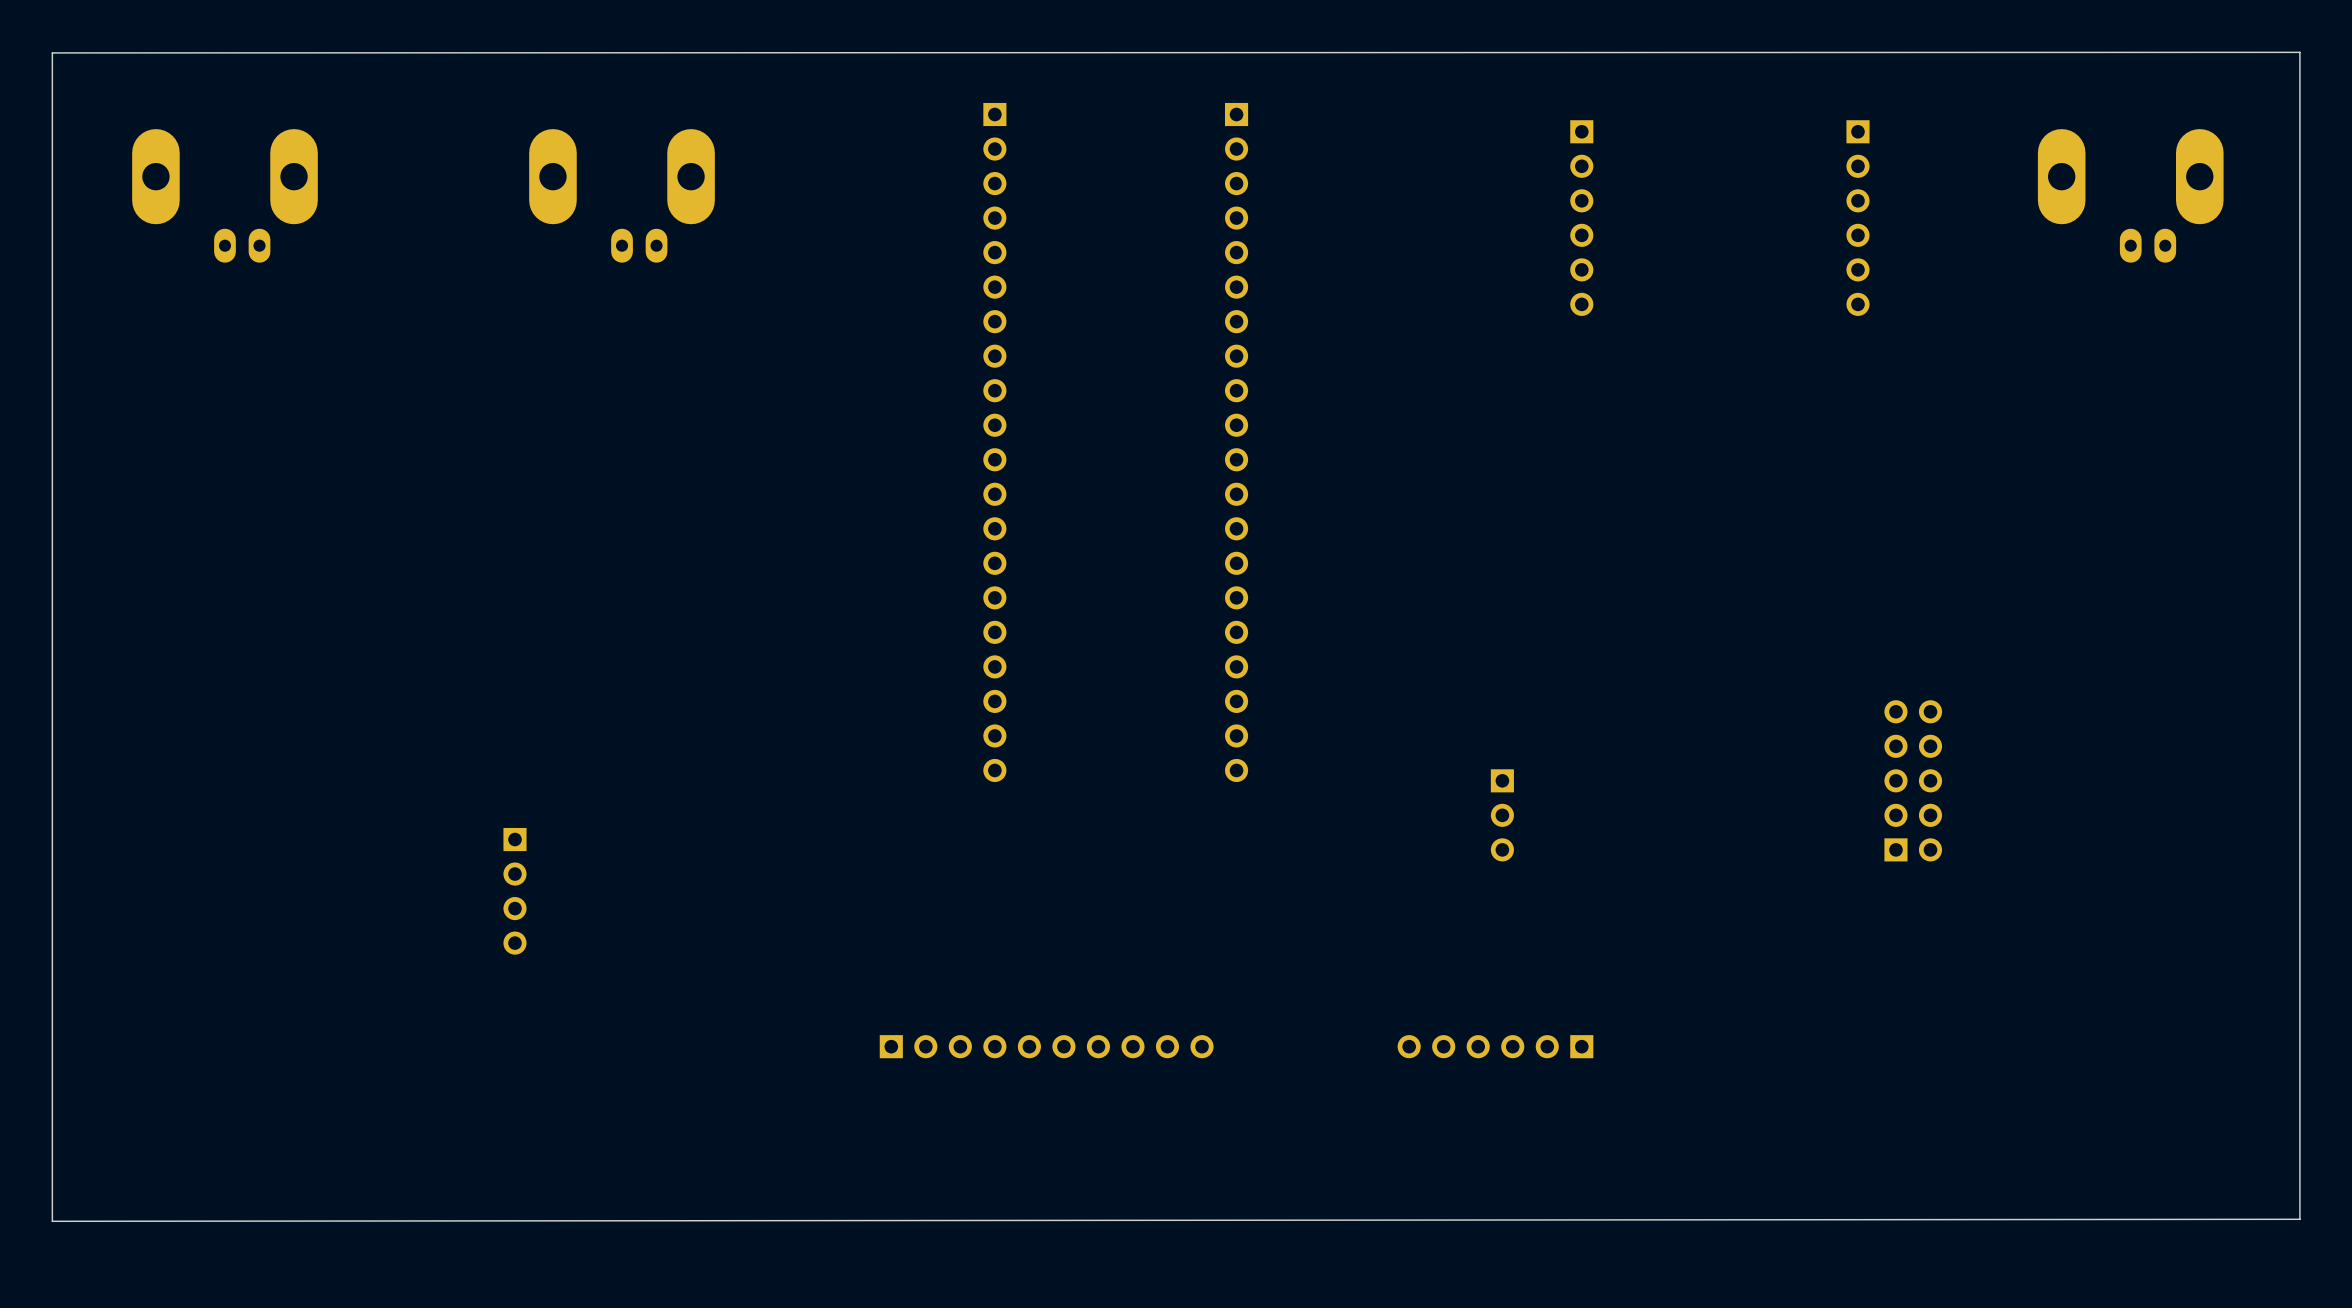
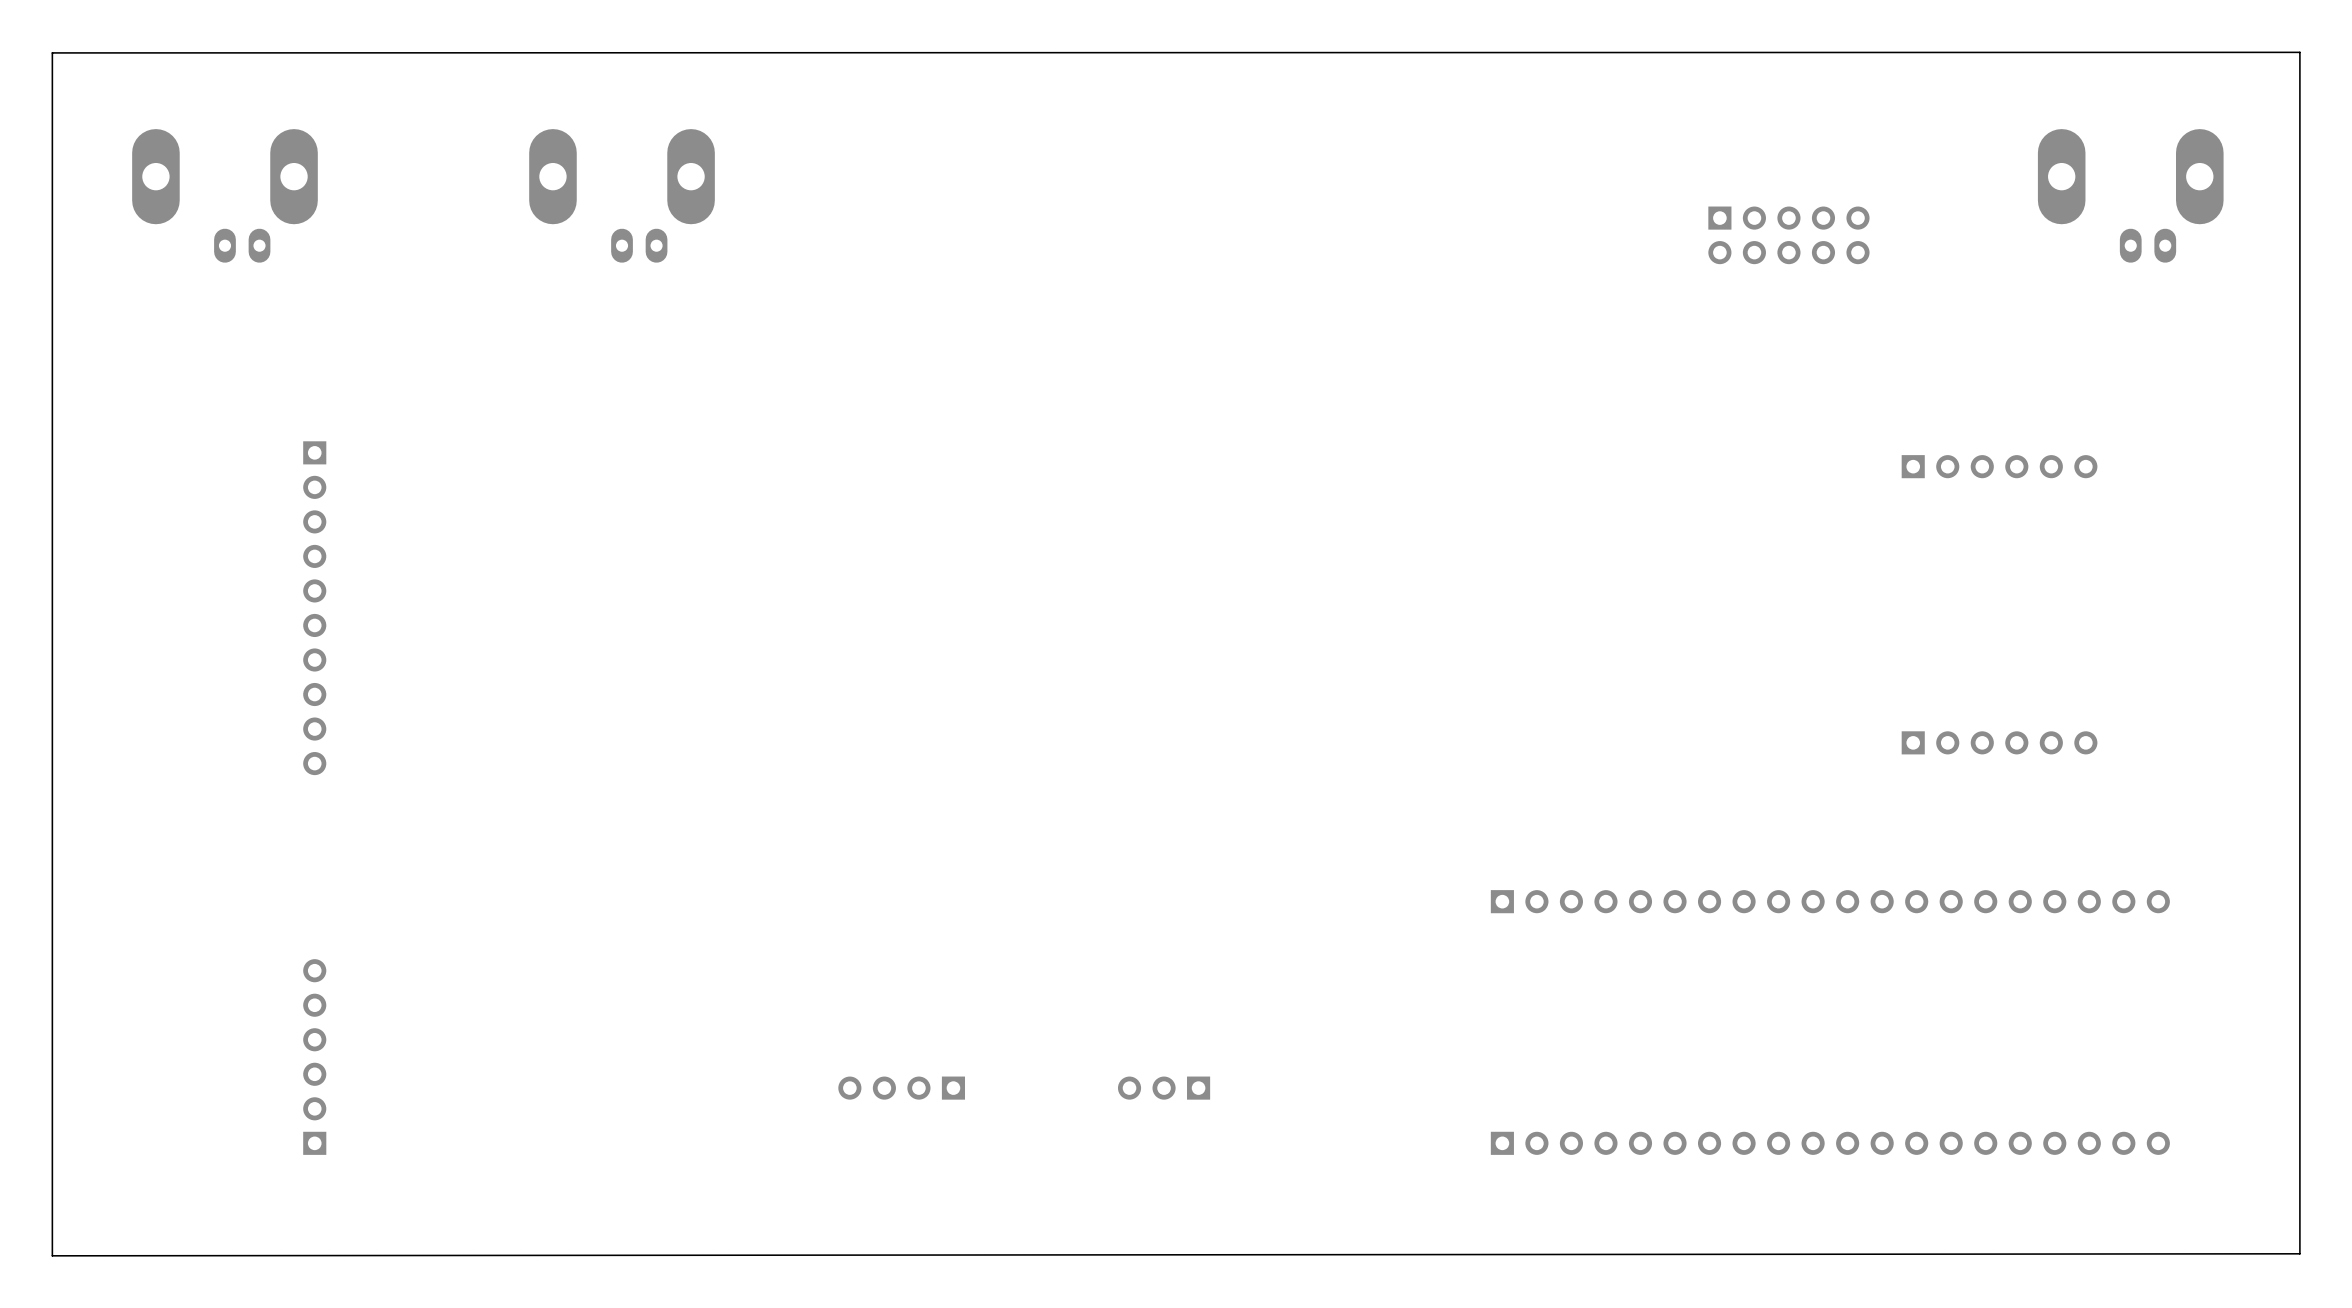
part: (1581, 218) -> none
part: (1857, 218) -> none
part: none -> (1788, 235)
part: (994, 442) -> none
part: (1236, 442) -> none
part: none -> (1999, 466)
part: none -> (314, 608)
part: none -> (1999, 742)
part: (1913, 780) -> none
part: (1502, 815) -> none
part: (514, 891) -> none
part: none -> (1830, 901)
part: (1046, 1046) -> none
part: (1495, 1046) -> none
part: none -> (314, 1057)
part: none -> (901, 1088)
part: none -> (1164, 1088)
part: none -> (1830, 1143)
board edge: (2299, 1219) (52, 1221) -> (2299, 1219) (2299, 1253) (52, 1255) (52, 1221)

